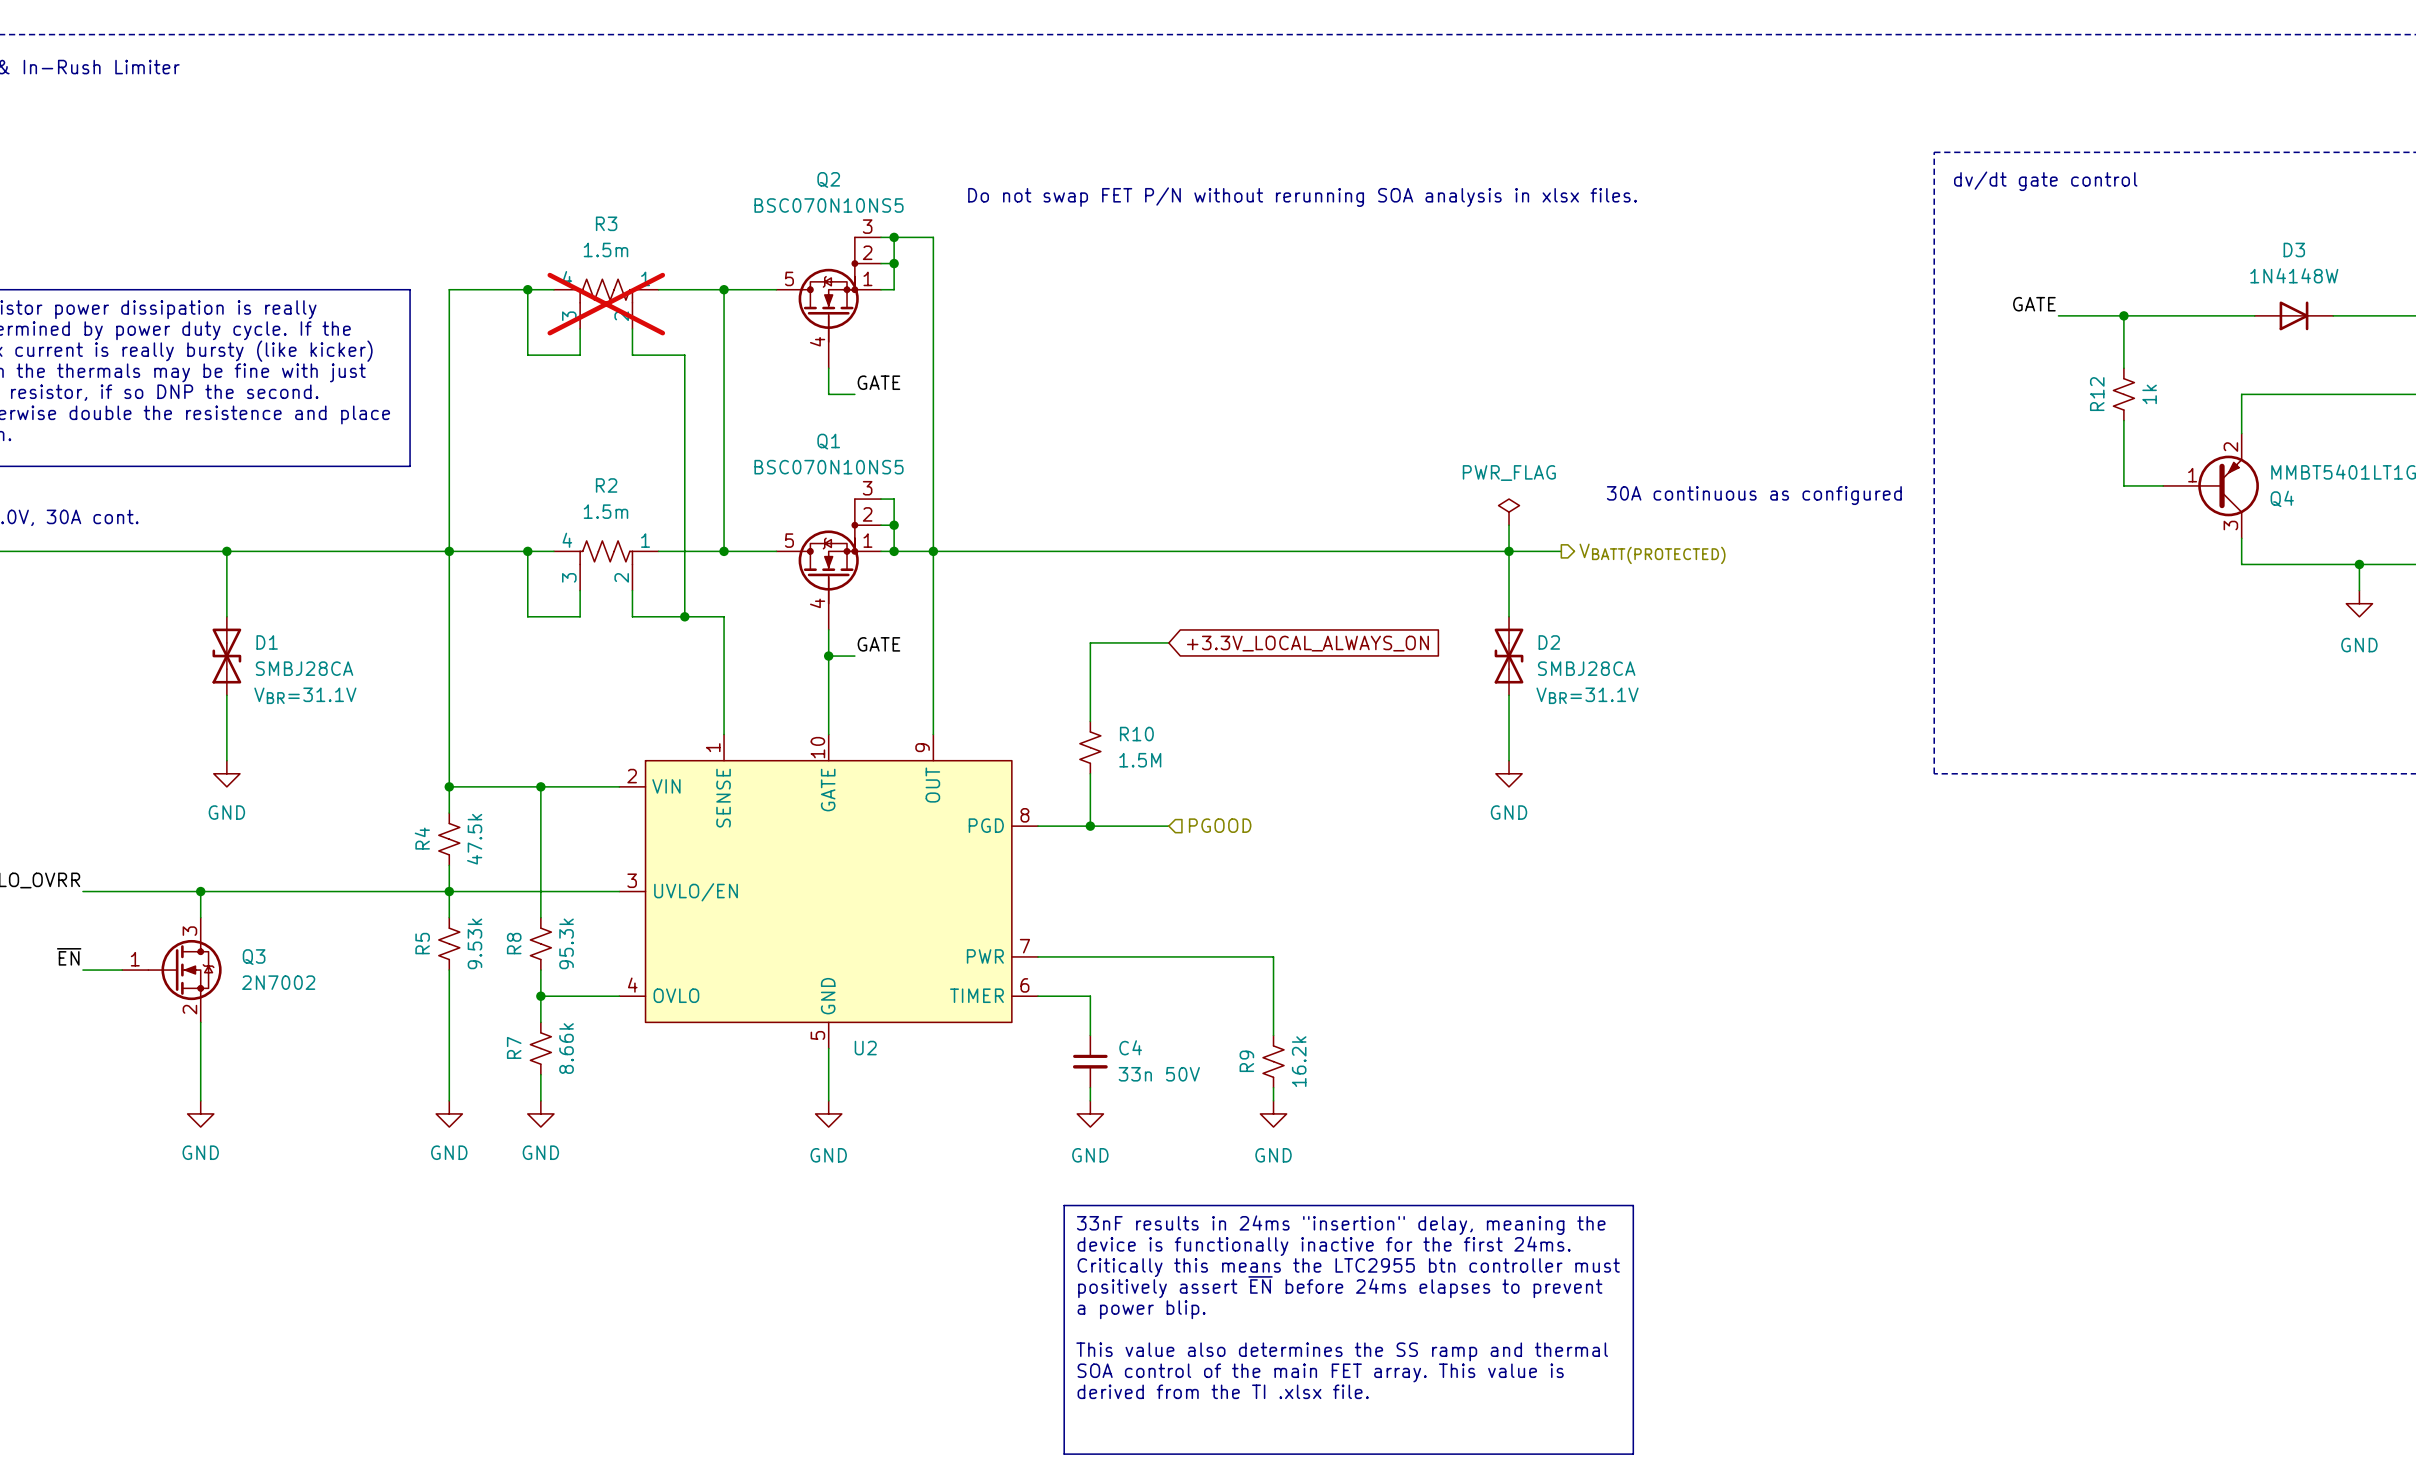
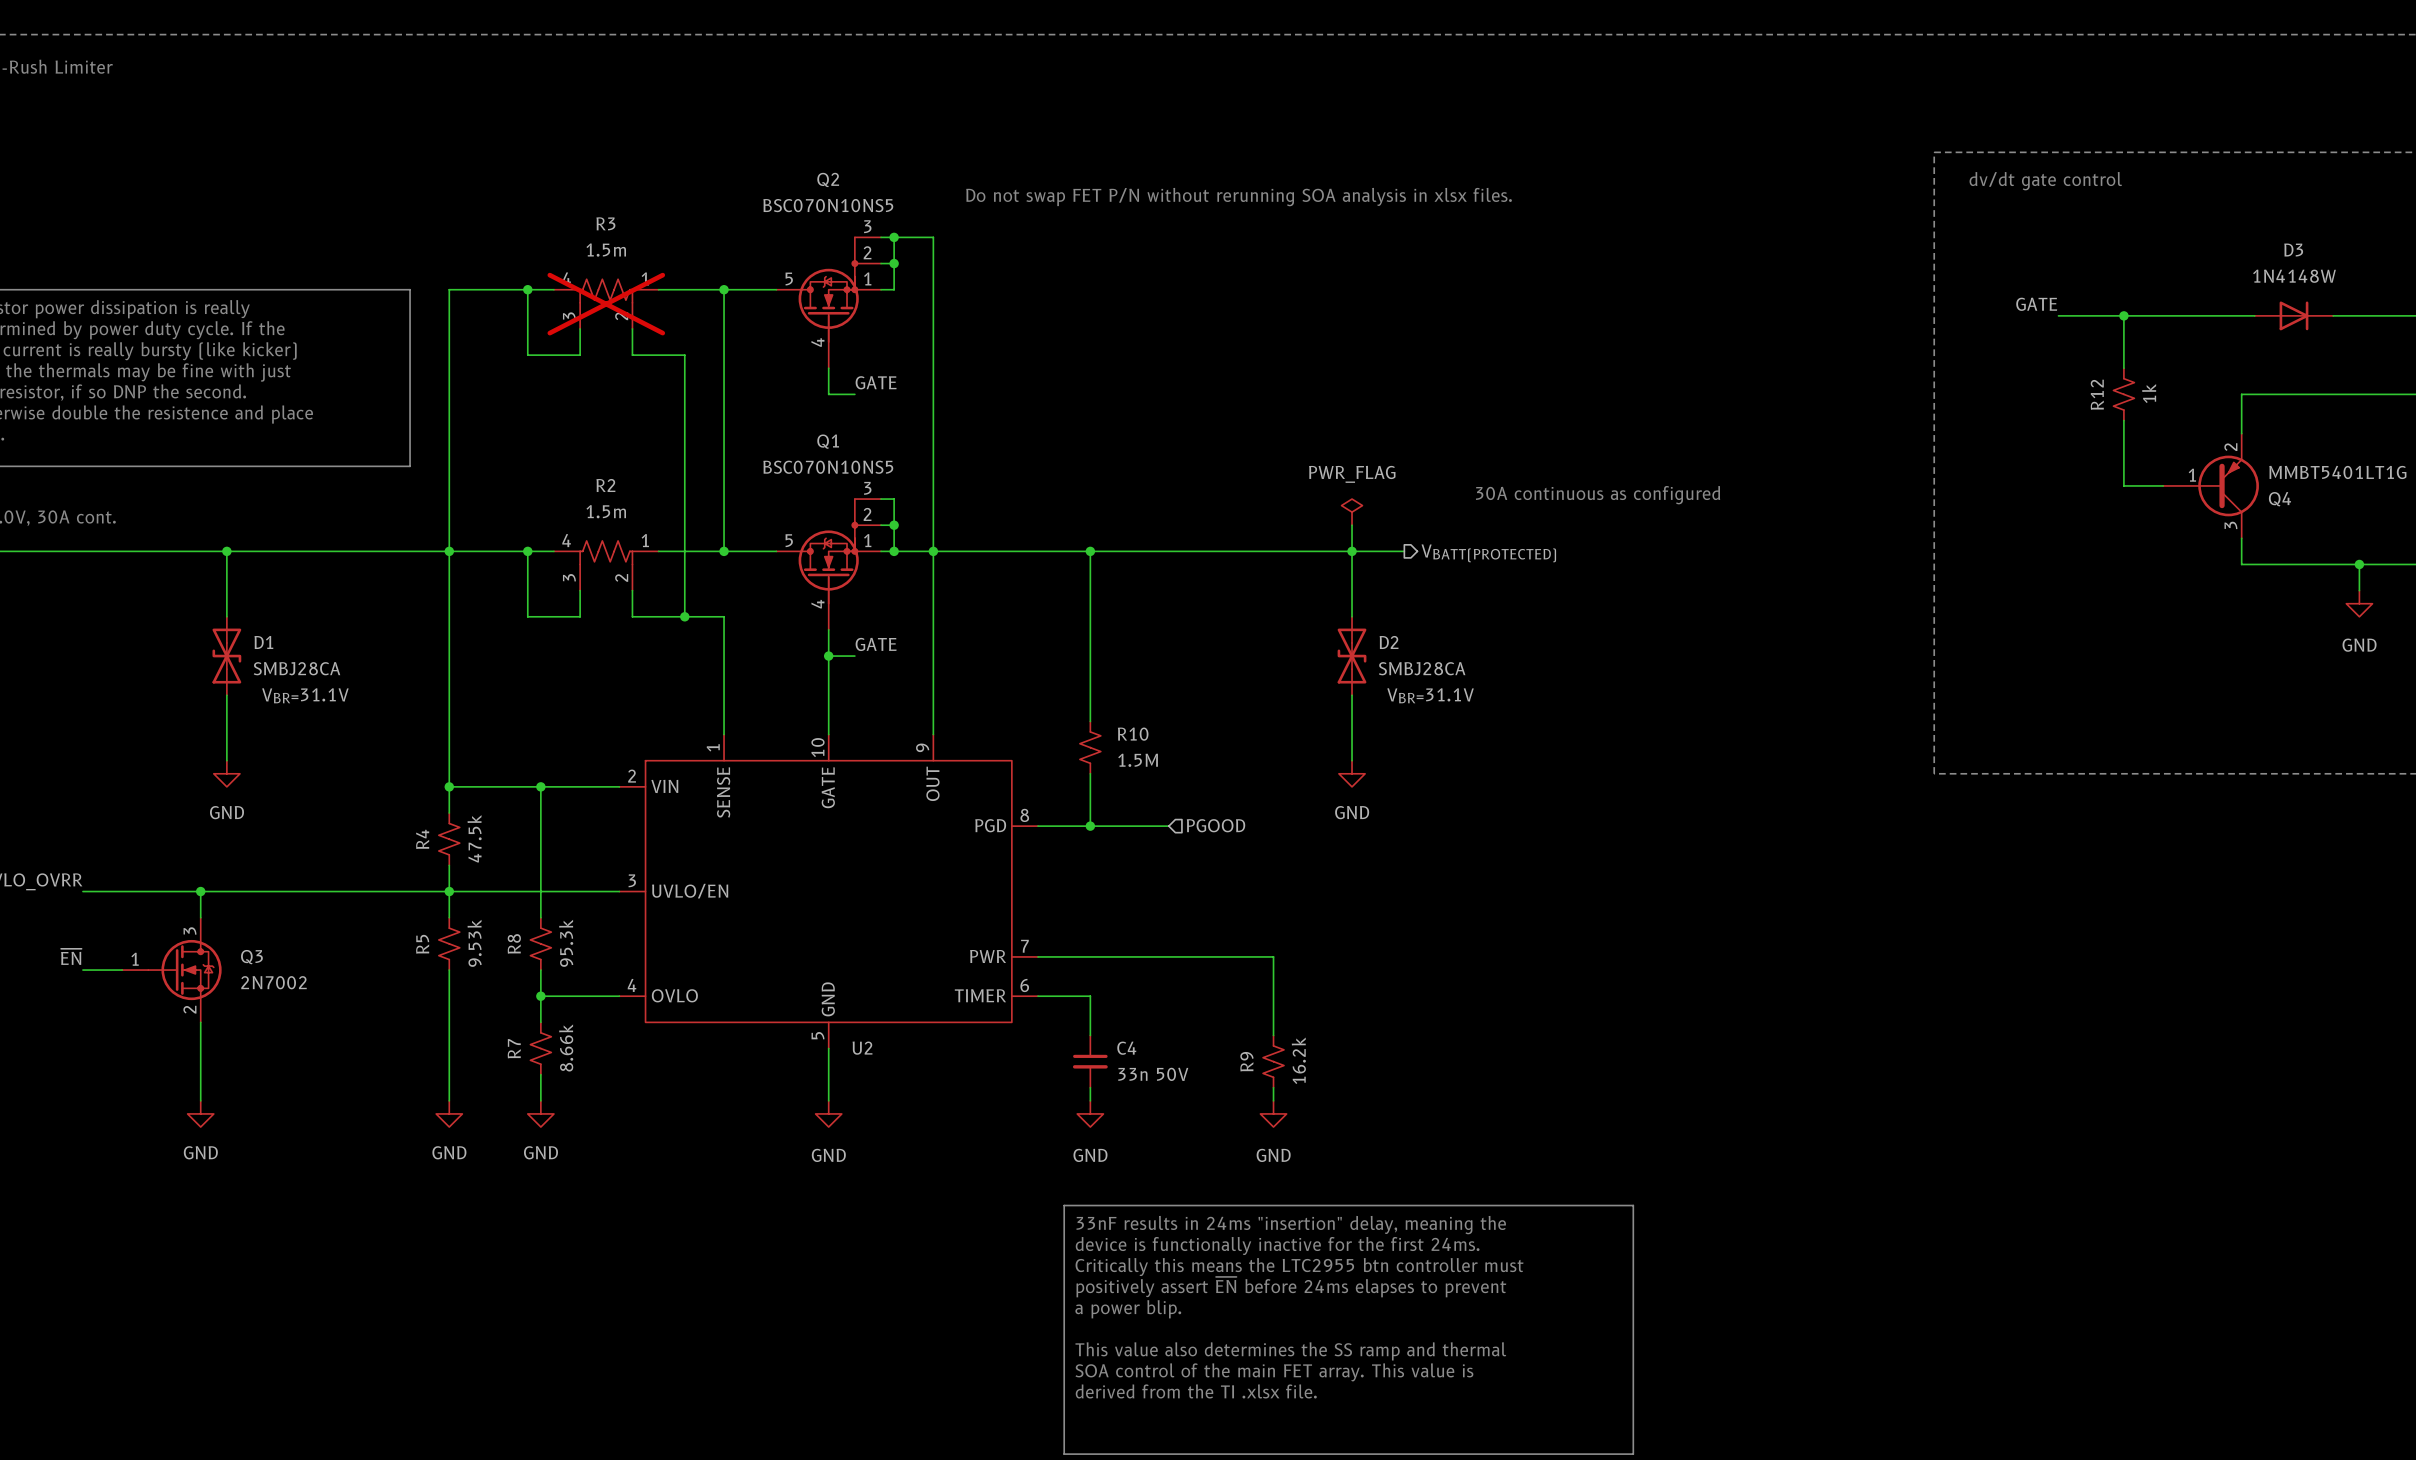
text position: 30A continuous as configured (1754, 495) -> 30A continuous as configured (1598, 495)
power symbol position: PWR_FLAG (1509, 512) -> PWR_FLAG (1352, 512)
wire: (1509, 525) (1509, 616) -> (1352, 525) (1352, 616)
junction: none -> (1090, 551)
junction: none -> (1352, 551)
wire: (1404, 551) (1561, 551) -> none
junction: (1509, 551) -> none
hierarchical label position: VBATT(PROTECTED) (1652, 553) -> VBATT(PROTECTED) (1488, 553)
wire: (1090, 642) (1168, 642) -> (1090, 642) (1090, 551)
global label: +3.3V_LOCAL_ALWAYS_ON (1307, 643) -> none
D2 position: (1509, 656) -> (1352, 656)
wire: (1509, 695) (1509, 760) -> (1352, 695) (1352, 760)
power symbol position: GND (1509, 773) -> GND (1352, 773)

